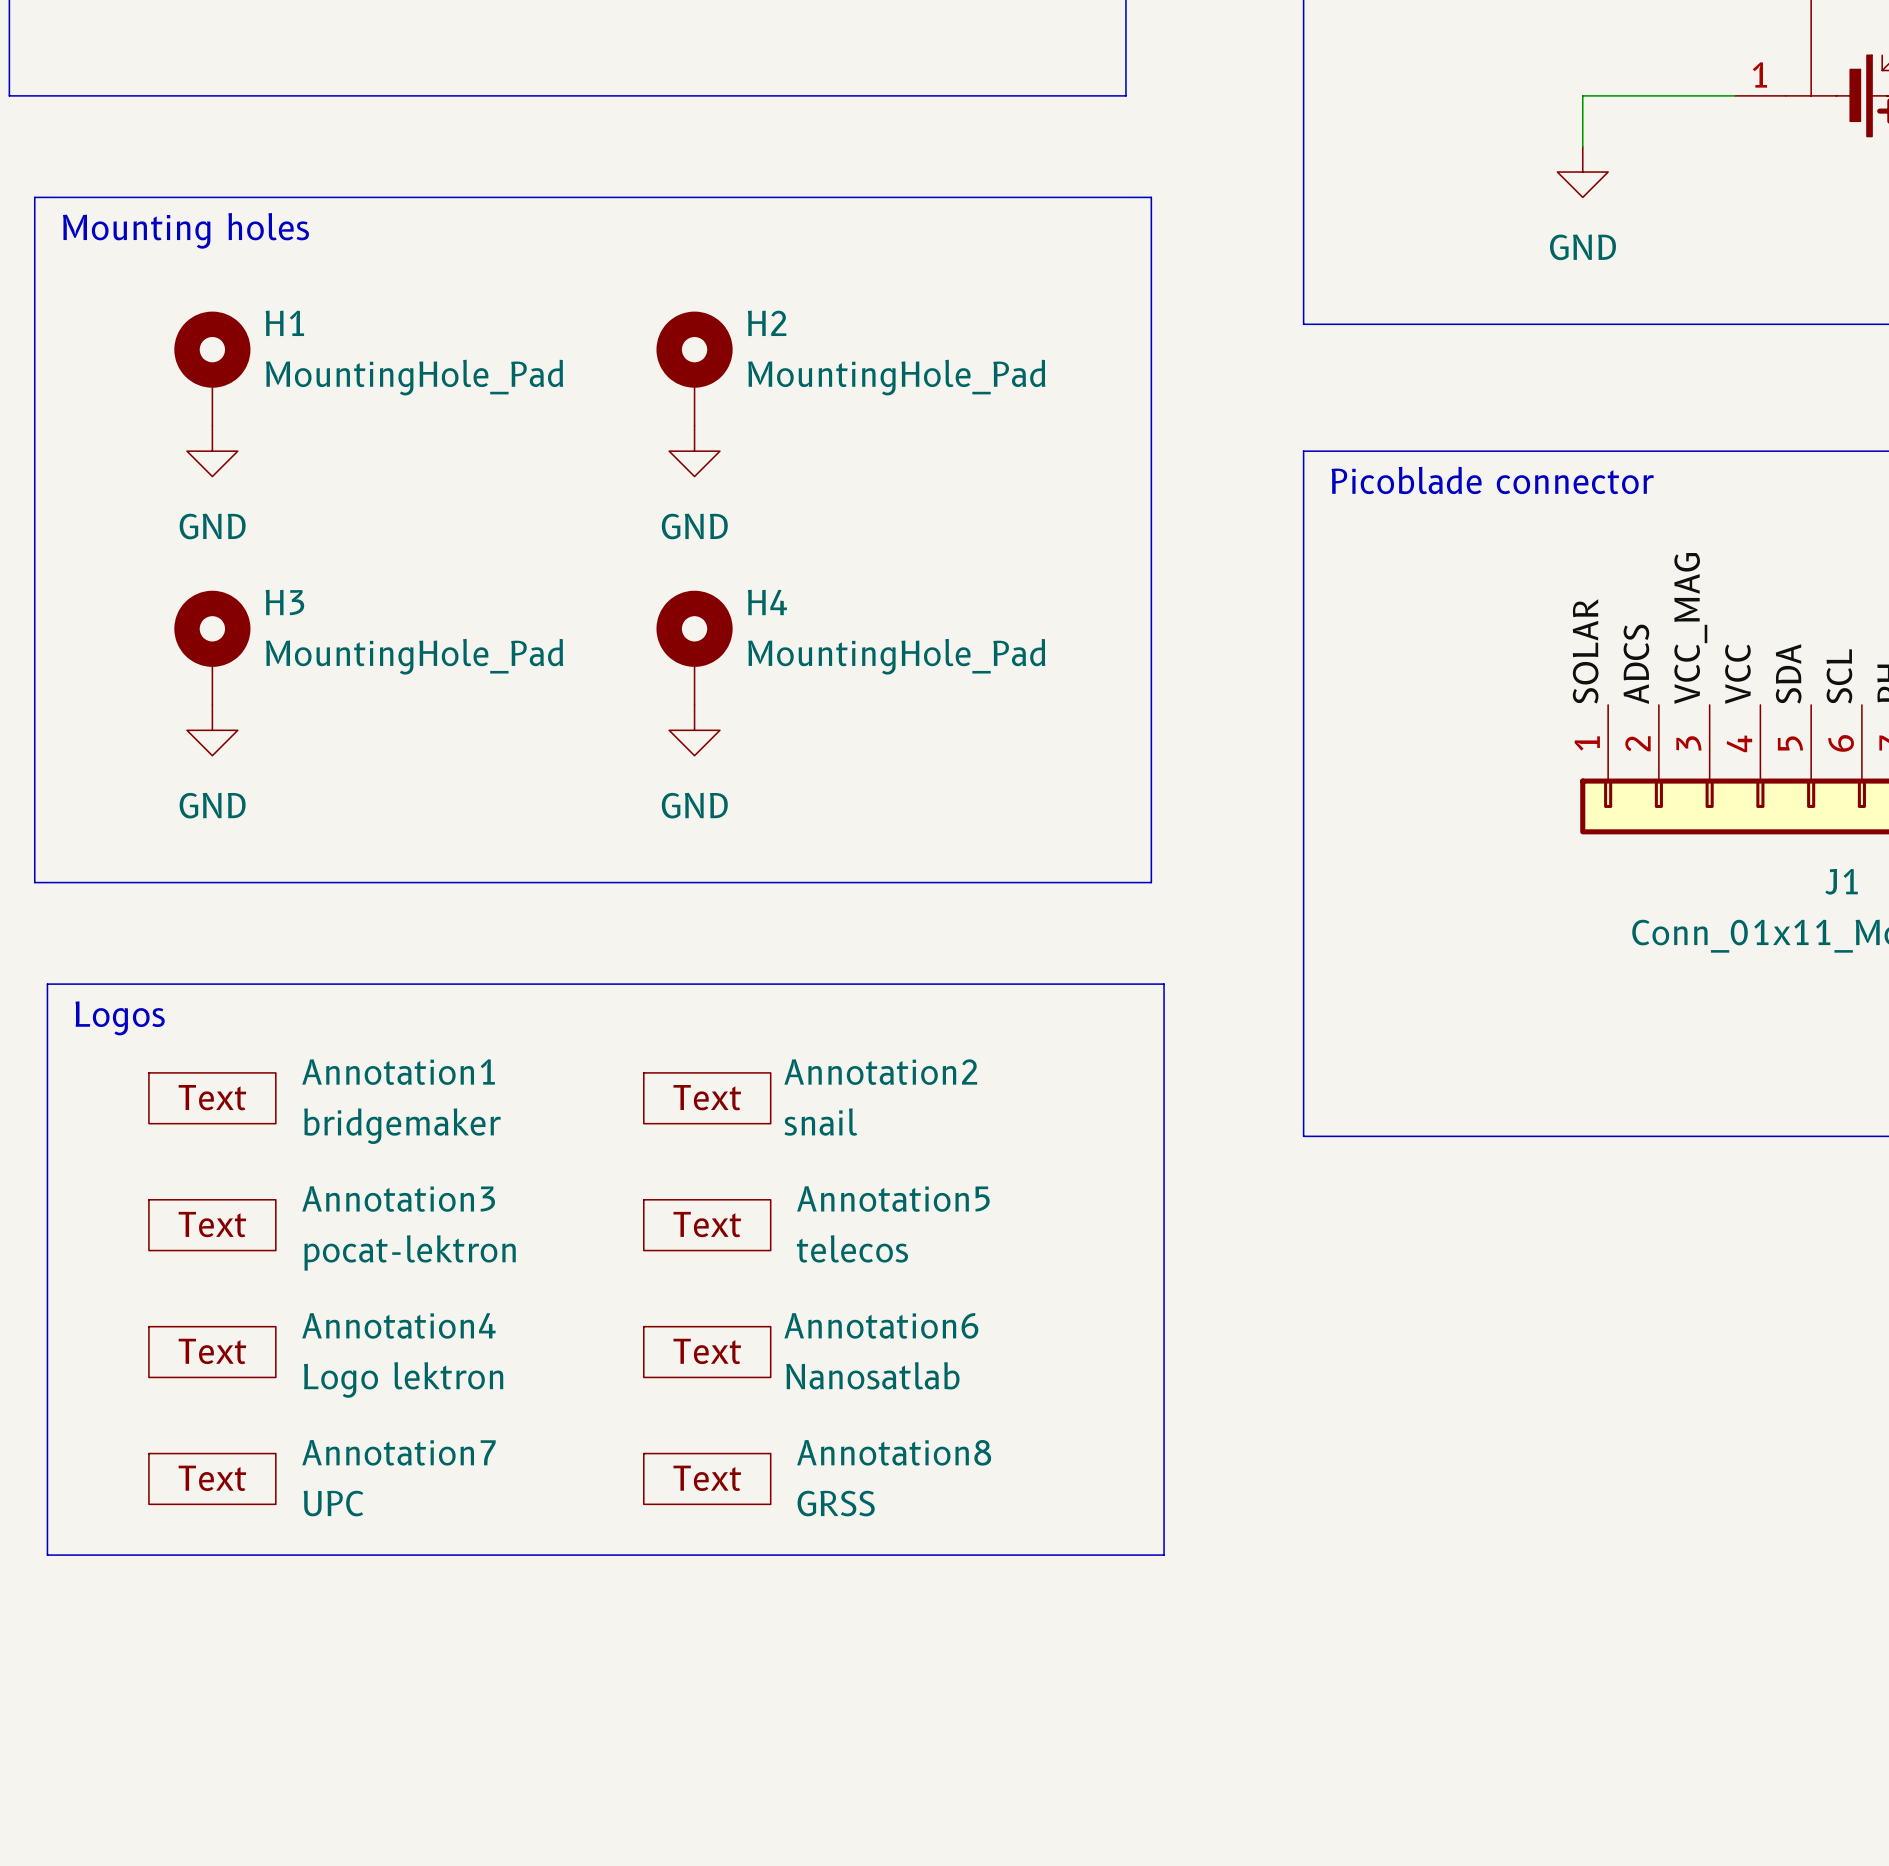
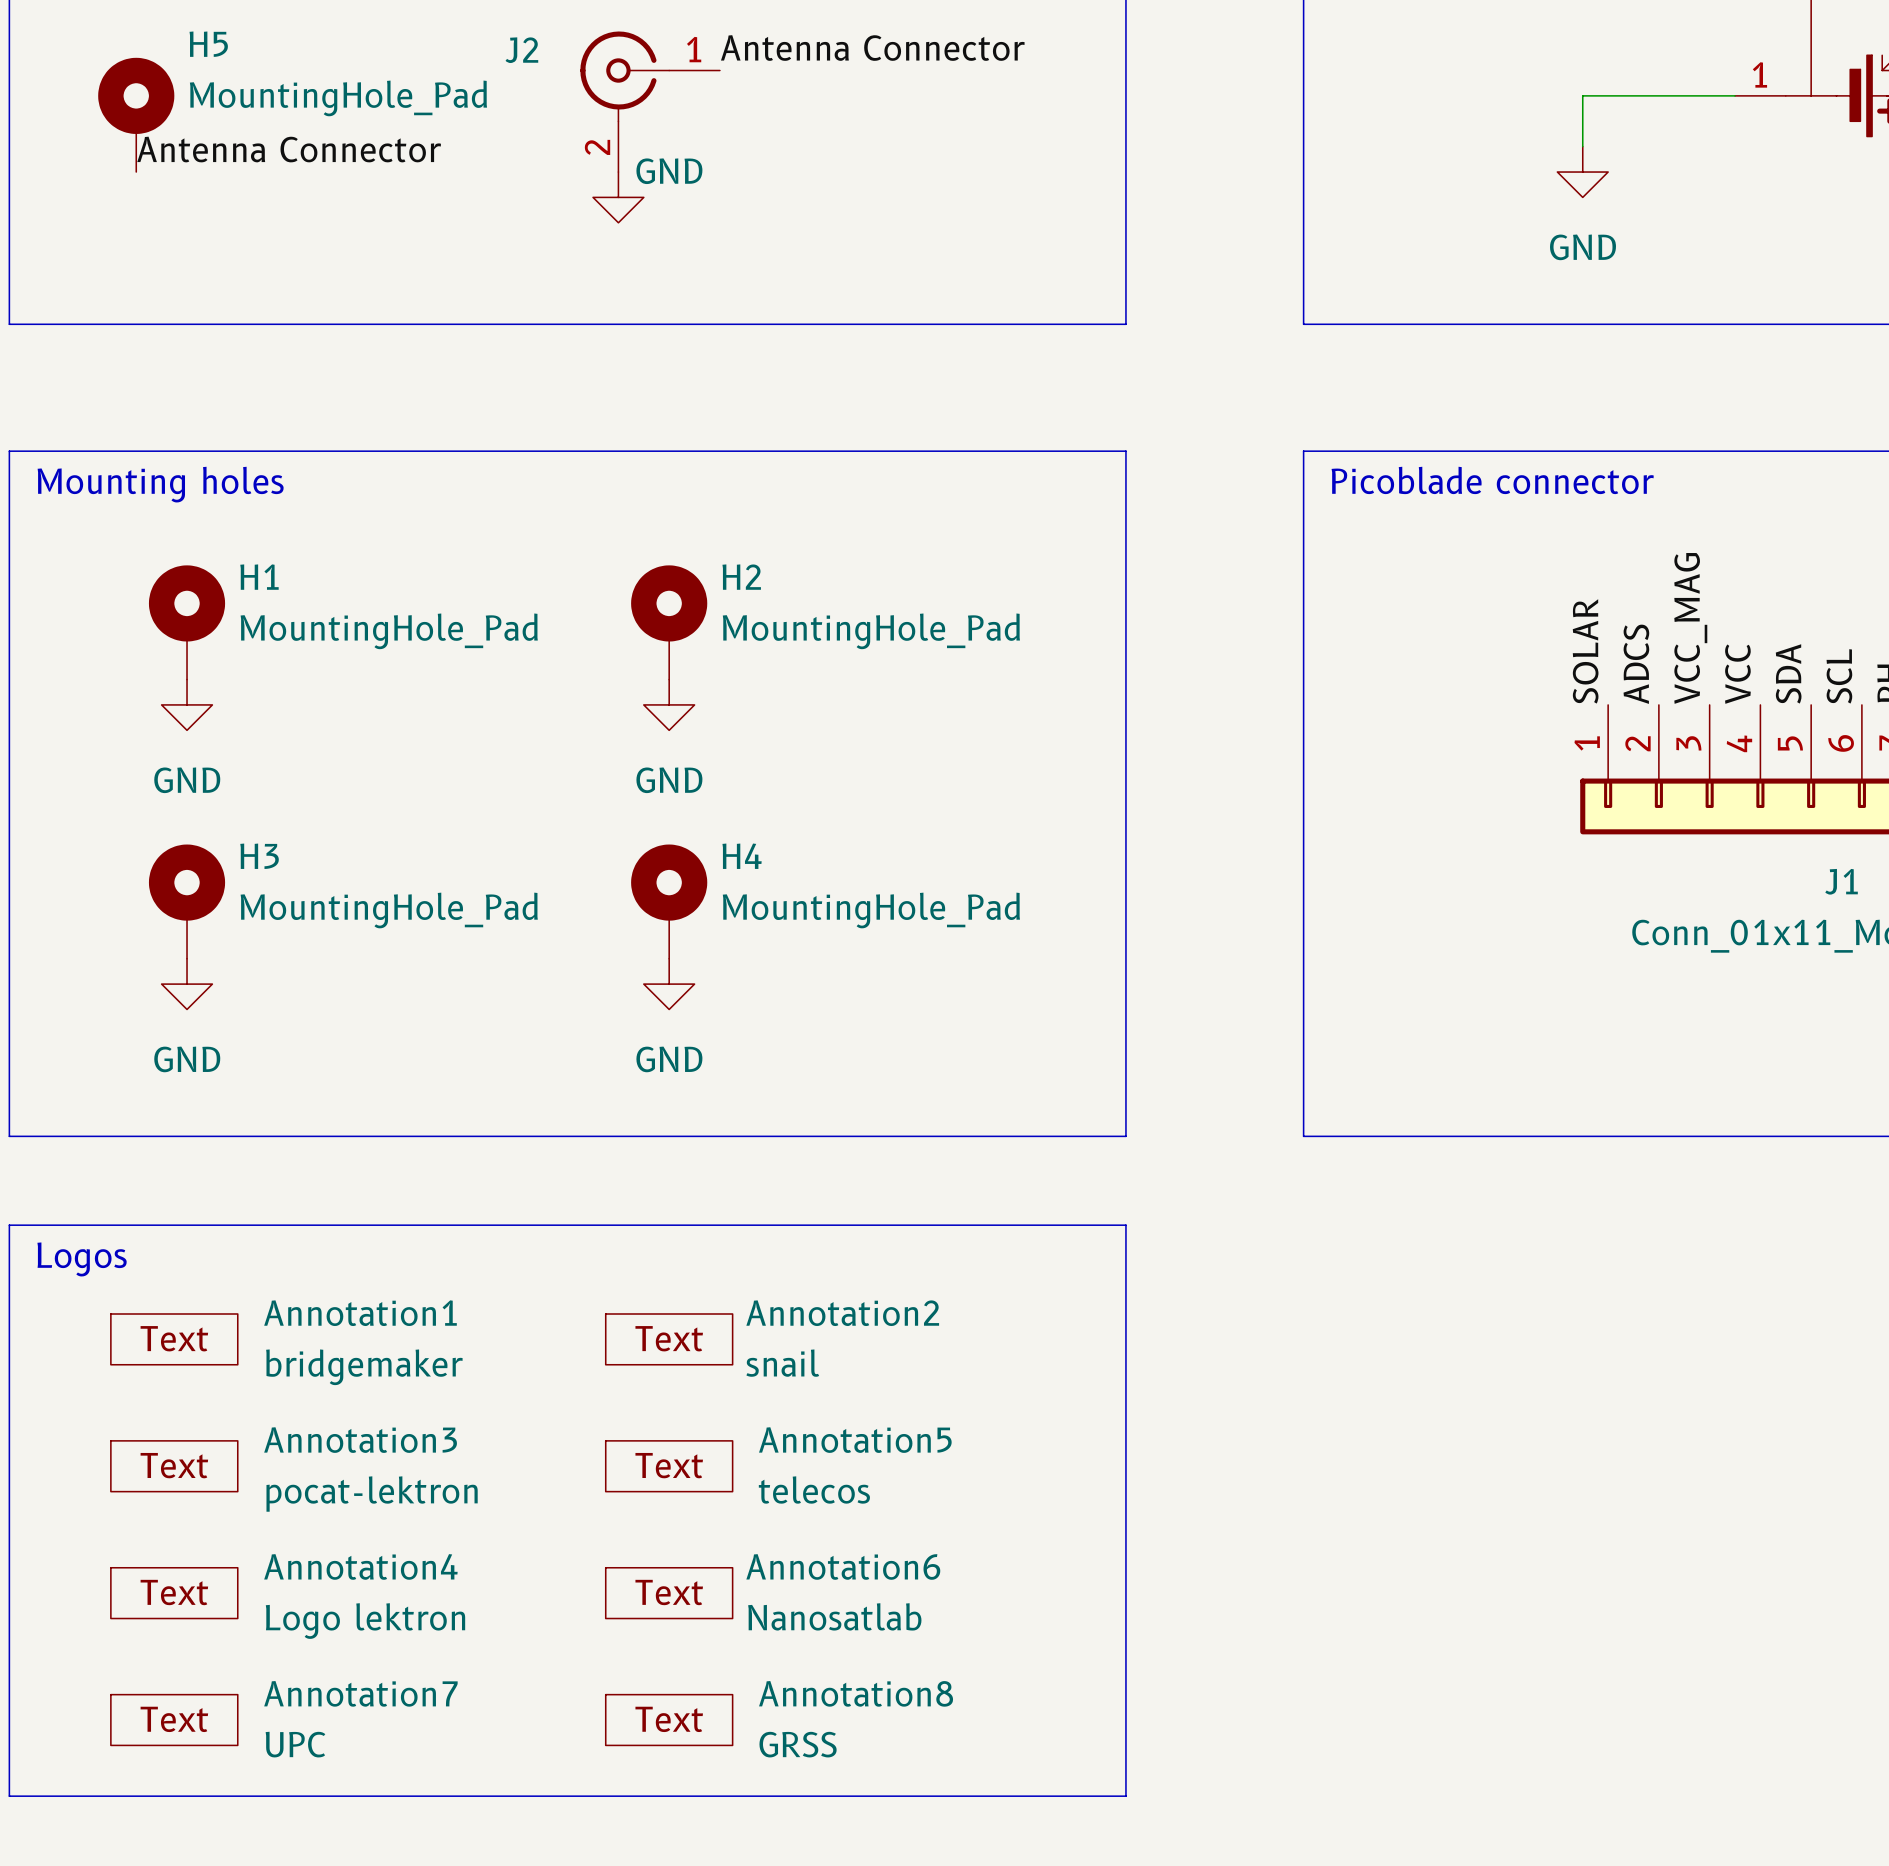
label: none -> Antenna Connector (872, 48)
line: (9, 95) (1125, 95) -> (9, 95) (9, 324) (1125, 324) (1125, 95)
J2: none -> (650, 101)
H5: none -> MountingHole_Pad (136, 114)
label: none -> Antenna Connector (289, 149)
line: (34, 197) (34, 882) (1151, 882) (1151, 197) (34, 197) -> (9, 451) (9, 1136) (1125, 1136) (1125, 451) (9, 451)
power symbol: none -> GND (618, 197)
text position: Mounting holes (185, 230) -> Mounting holes (160, 484)
H1 position: (212, 368) -> (187, 622)
H2 position: (694, 368) -> (669, 622)
power symbol: GND (212, 451) -> none
power symbol: GND (694, 451) -> none
H3 position: (212, 647) -> (187, 901)
H4 position: (694, 647) -> (669, 901)
power symbol position: GND (212, 730) -> GND (187, 704)
power symbol position: GND (694, 730) -> GND (669, 704)
line: (47, 984) (47, 1555) (1164, 1555) (1164, 984) (47, 984) -> (9, 1225) (9, 1796) (1125, 1796) (1125, 1225) (9, 1225)
power symbol: none -> GND (187, 984)
power symbol: none -> GND (669, 984)
text position: Logos (120, 1018) -> Logos (82, 1259)
Annotation1 position: (212, 1098) -> (174, 1339)
Annotation2 position: (707, 1098) -> (669, 1339)
Annotation3 position: (212, 1225) -> (174, 1466)
Annotation5 position: (707, 1225) -> (669, 1466)
Annotation4 position: (212, 1352) -> (174, 1593)
Annotation6 position: (707, 1352) -> (669, 1593)
Annotation7 position: (212, 1478) -> (174, 1720)
Annotation8 position: (707, 1478) -> (669, 1720)

